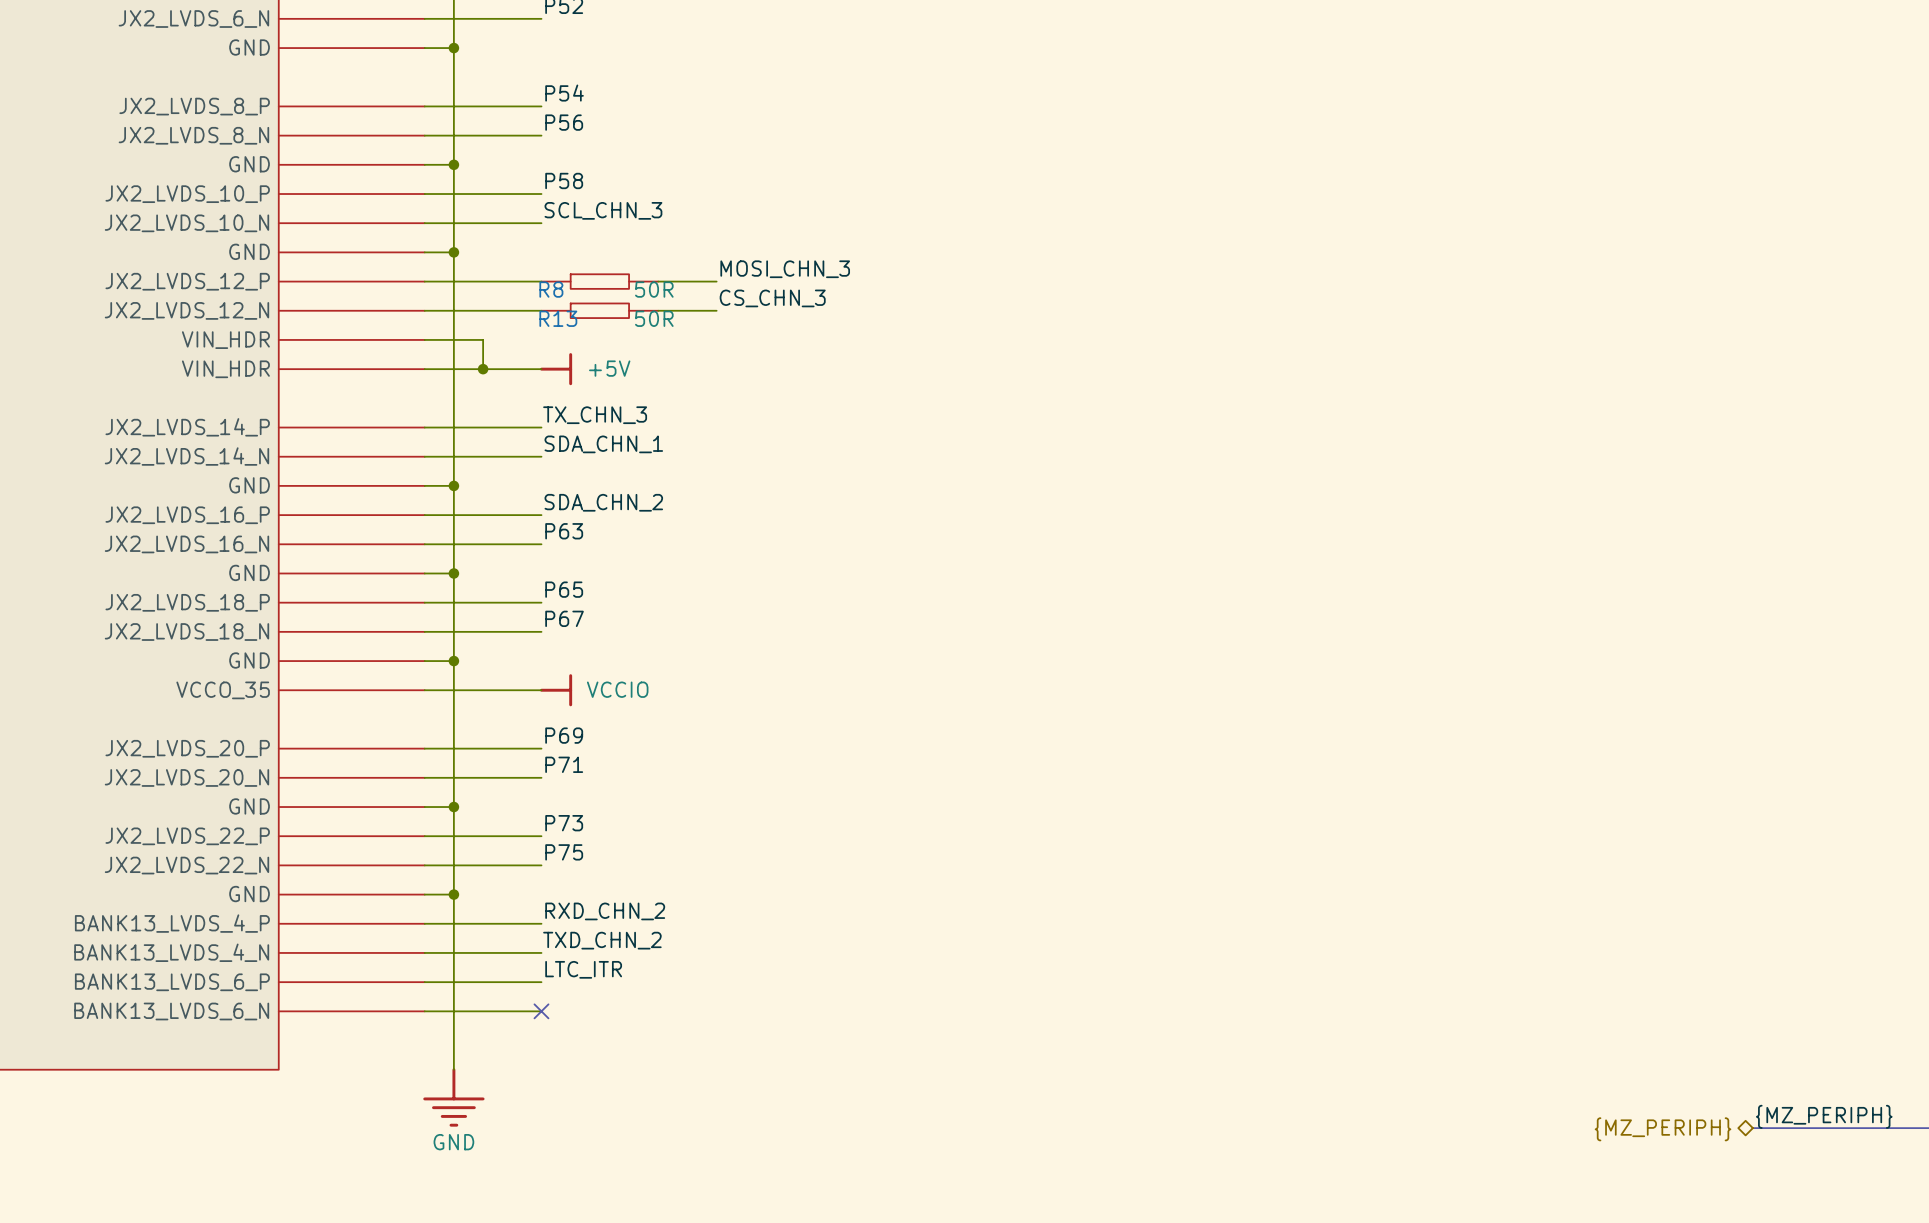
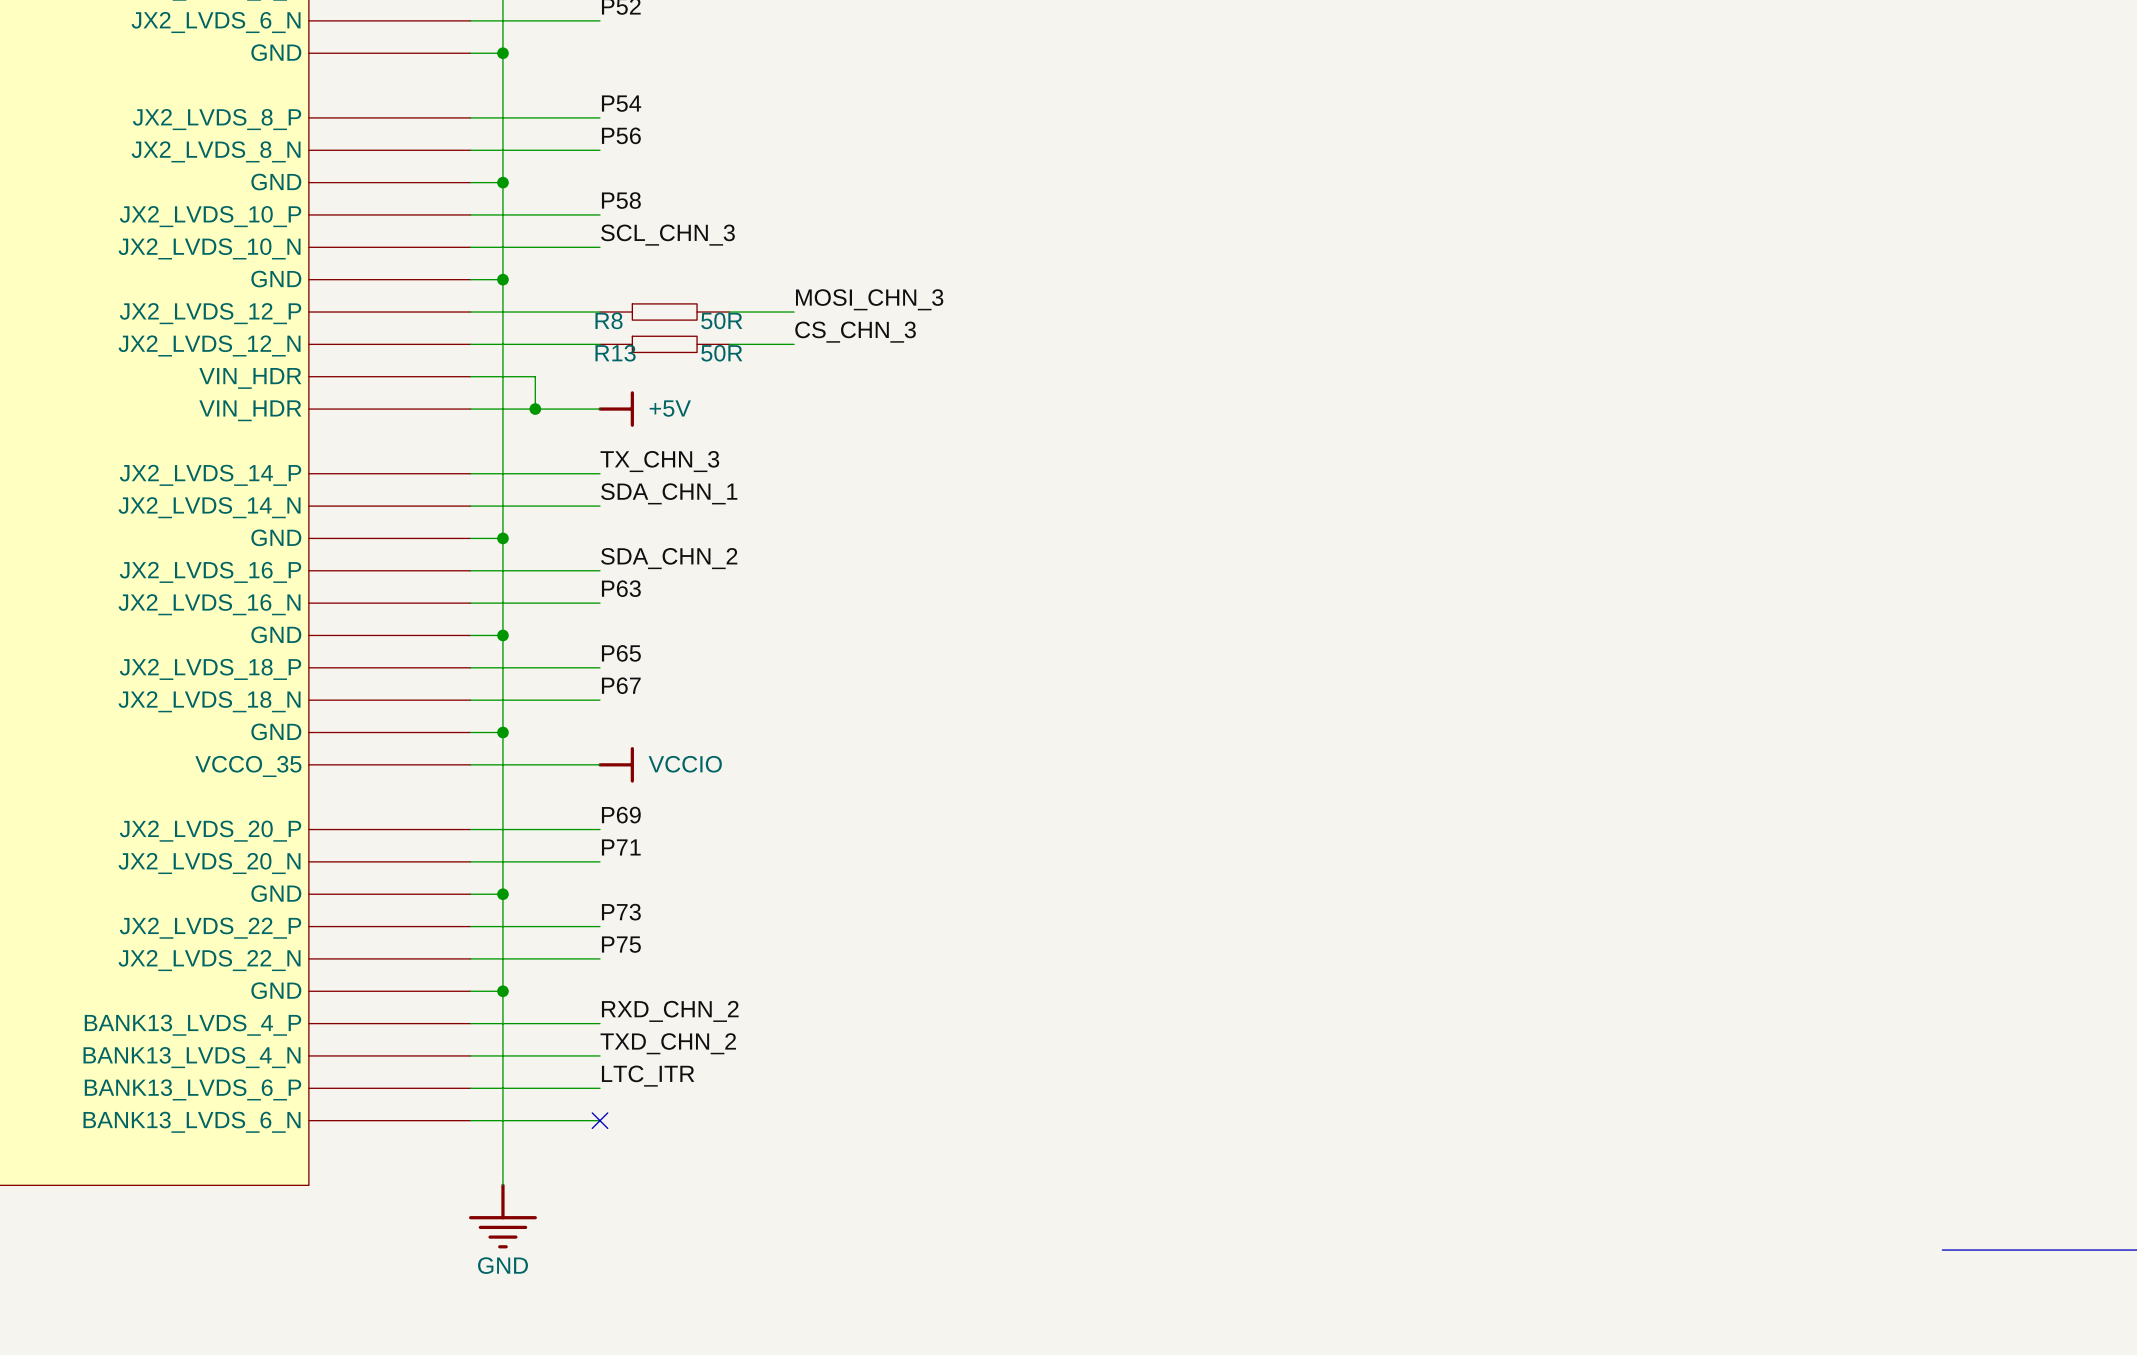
label: {MZ_PERIPH} (1824, 1116) -> none
hierarchical label: {MZ_PERIPH} (1663, 1129) -> none

